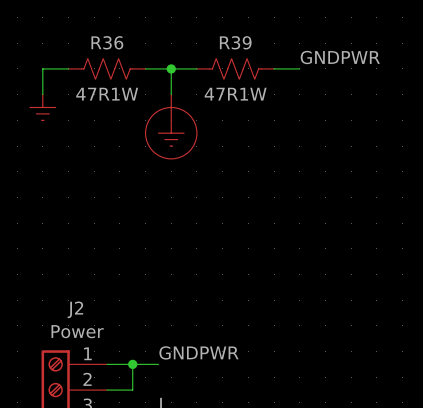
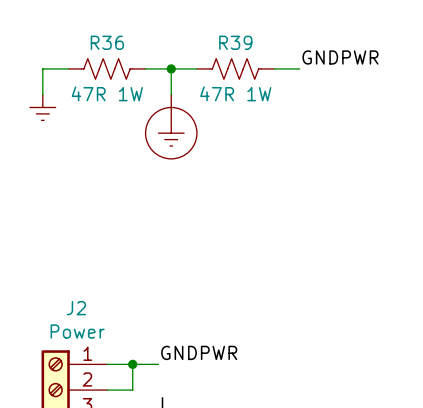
R36 value: 47R1W (107, 94) -> 47R 1W (107, 93)
R39 value: 47R1W (235, 94) -> 47R 1W (235, 93)

